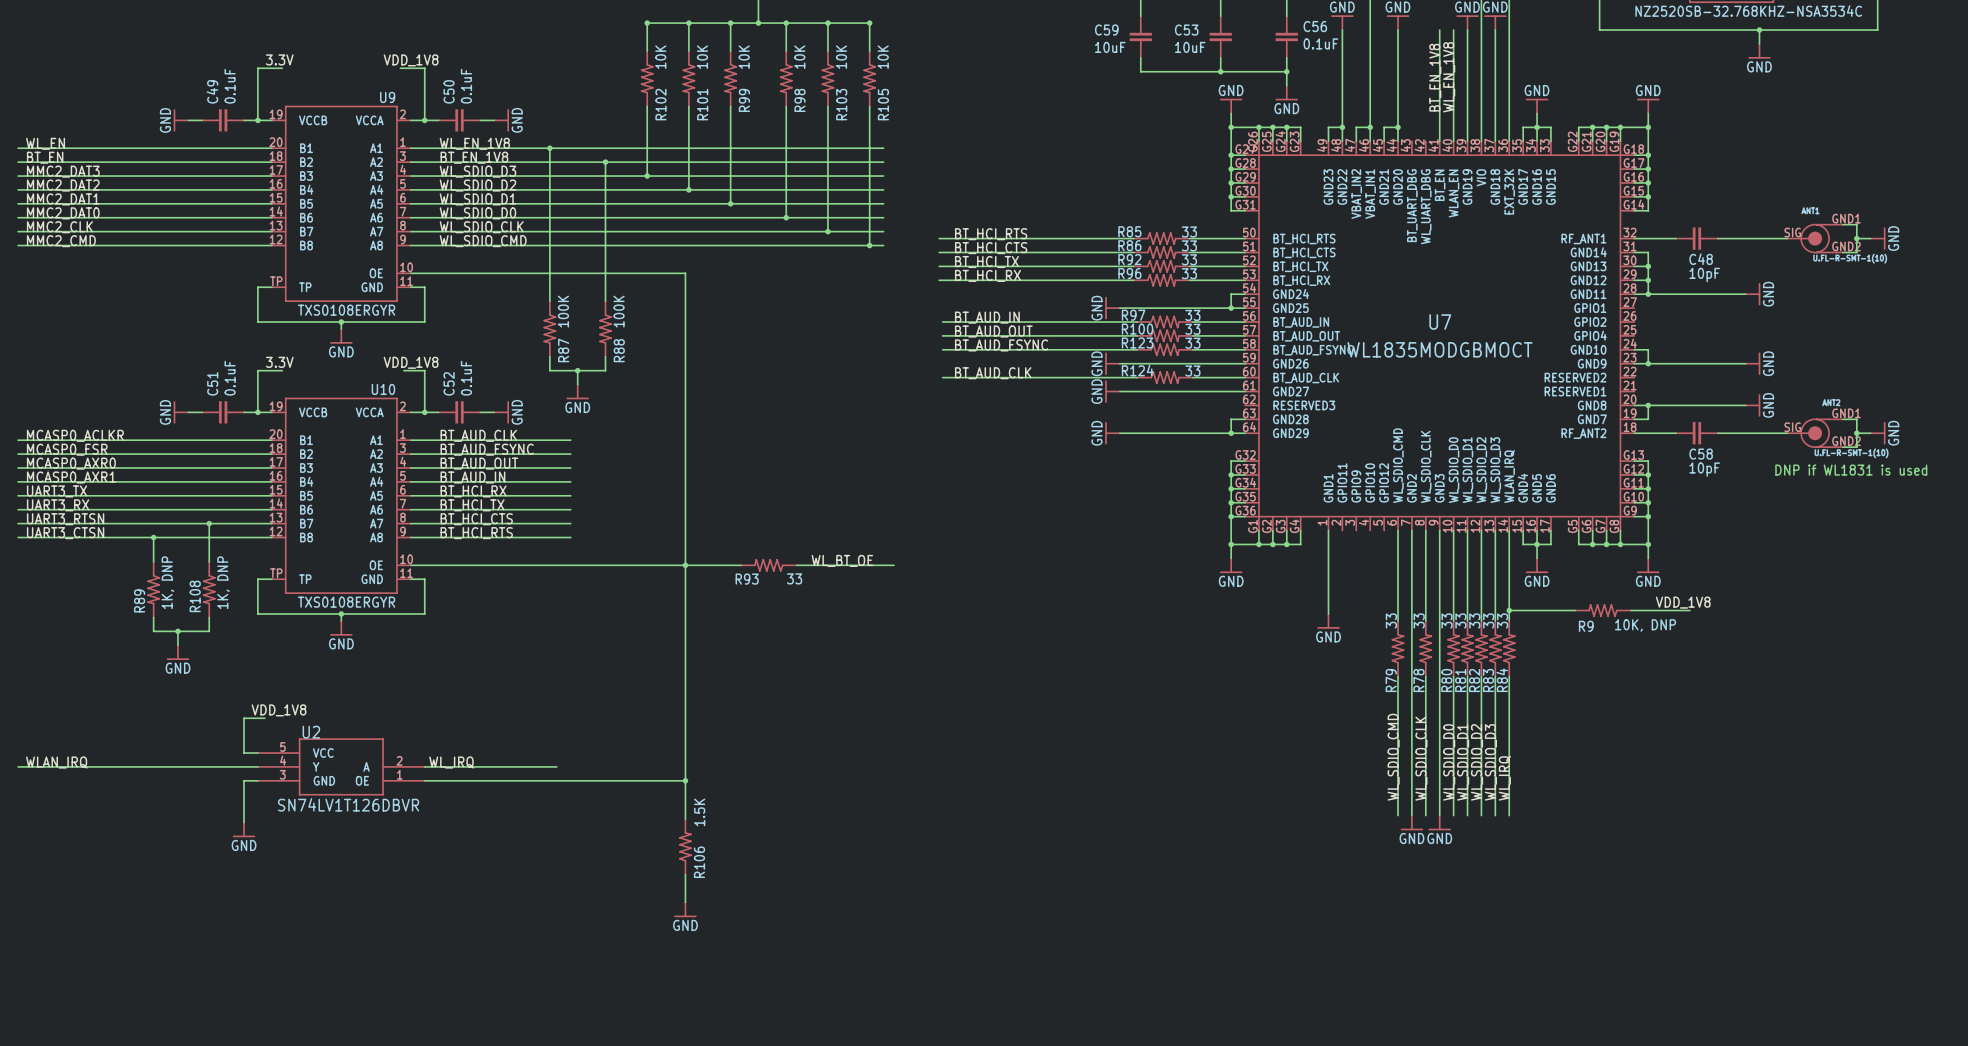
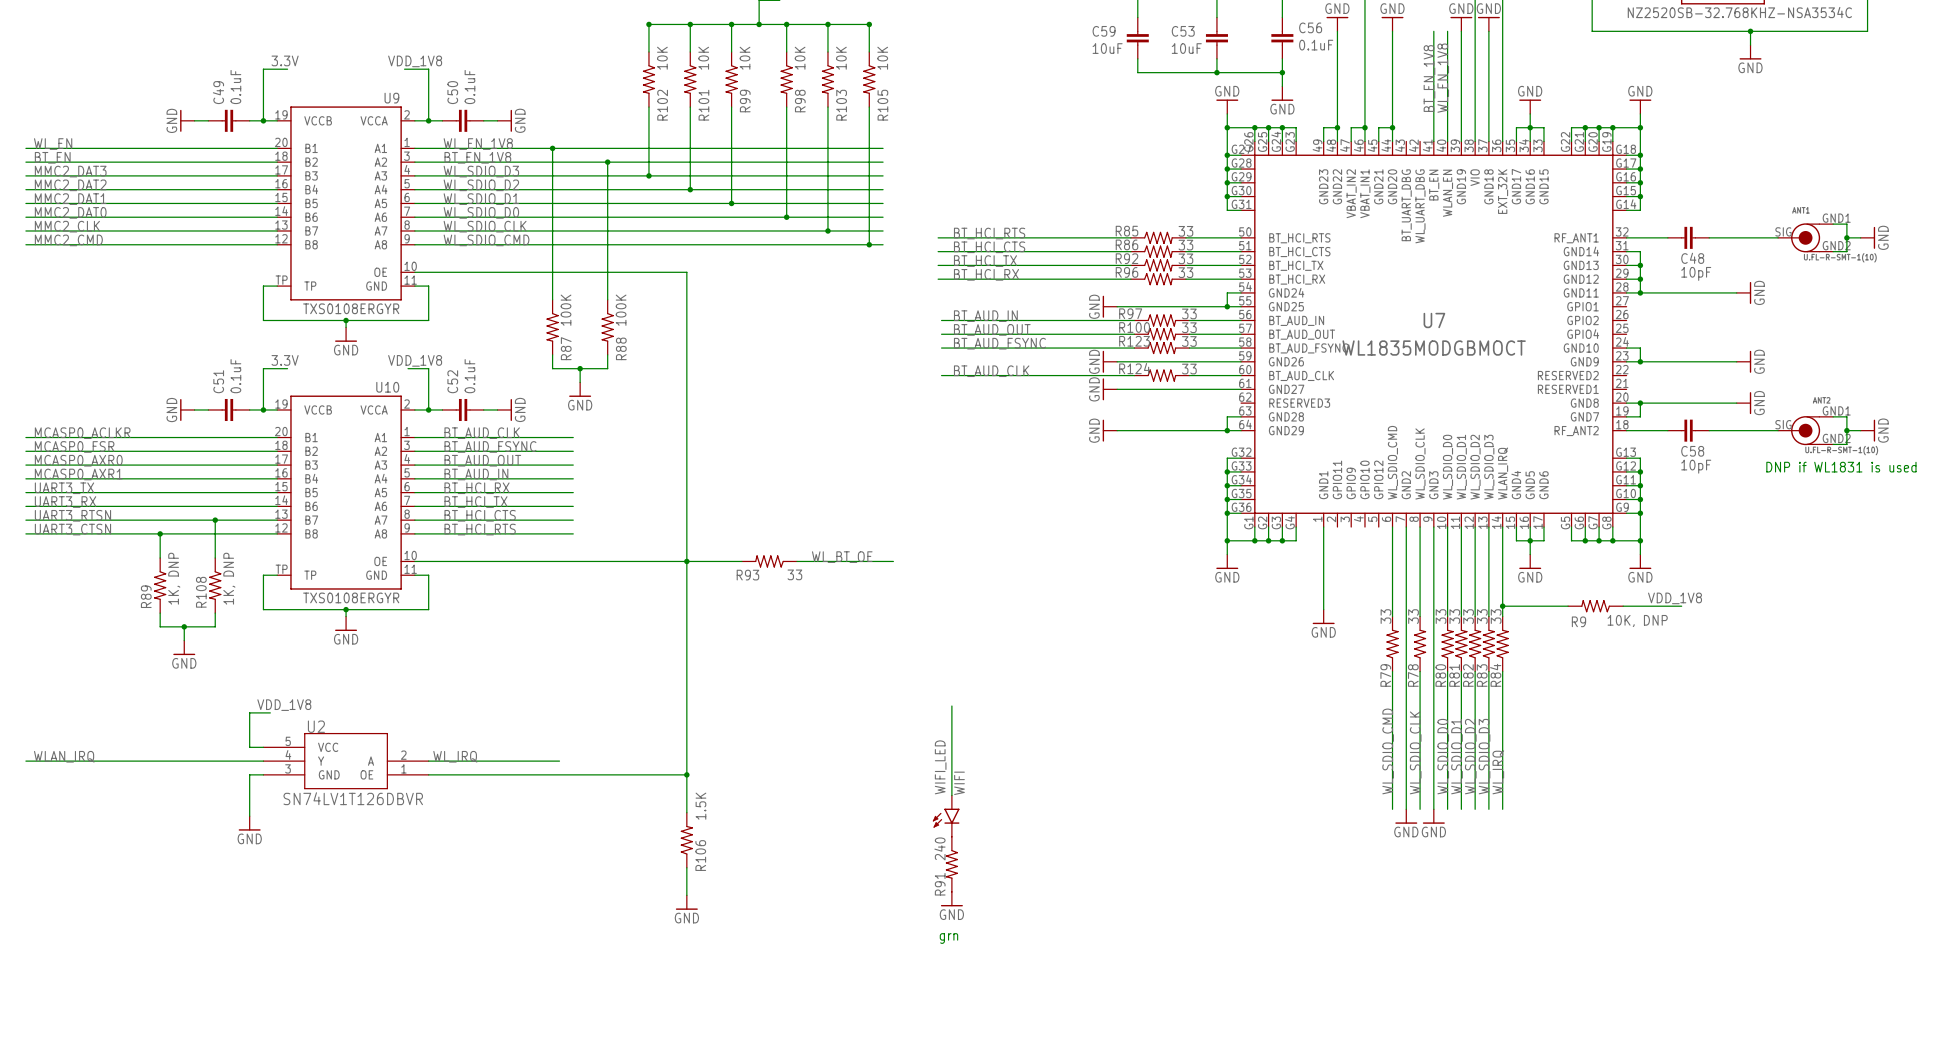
wire: none -> (951, 706) (951, 795)
label: none -> WIFI_LED (940, 767)
WIFI: none -> (946, 816)
R91: none -> 240 (951, 864)
power symbol: none -> GND (951, 899)
text: none -> grn (948, 938)

